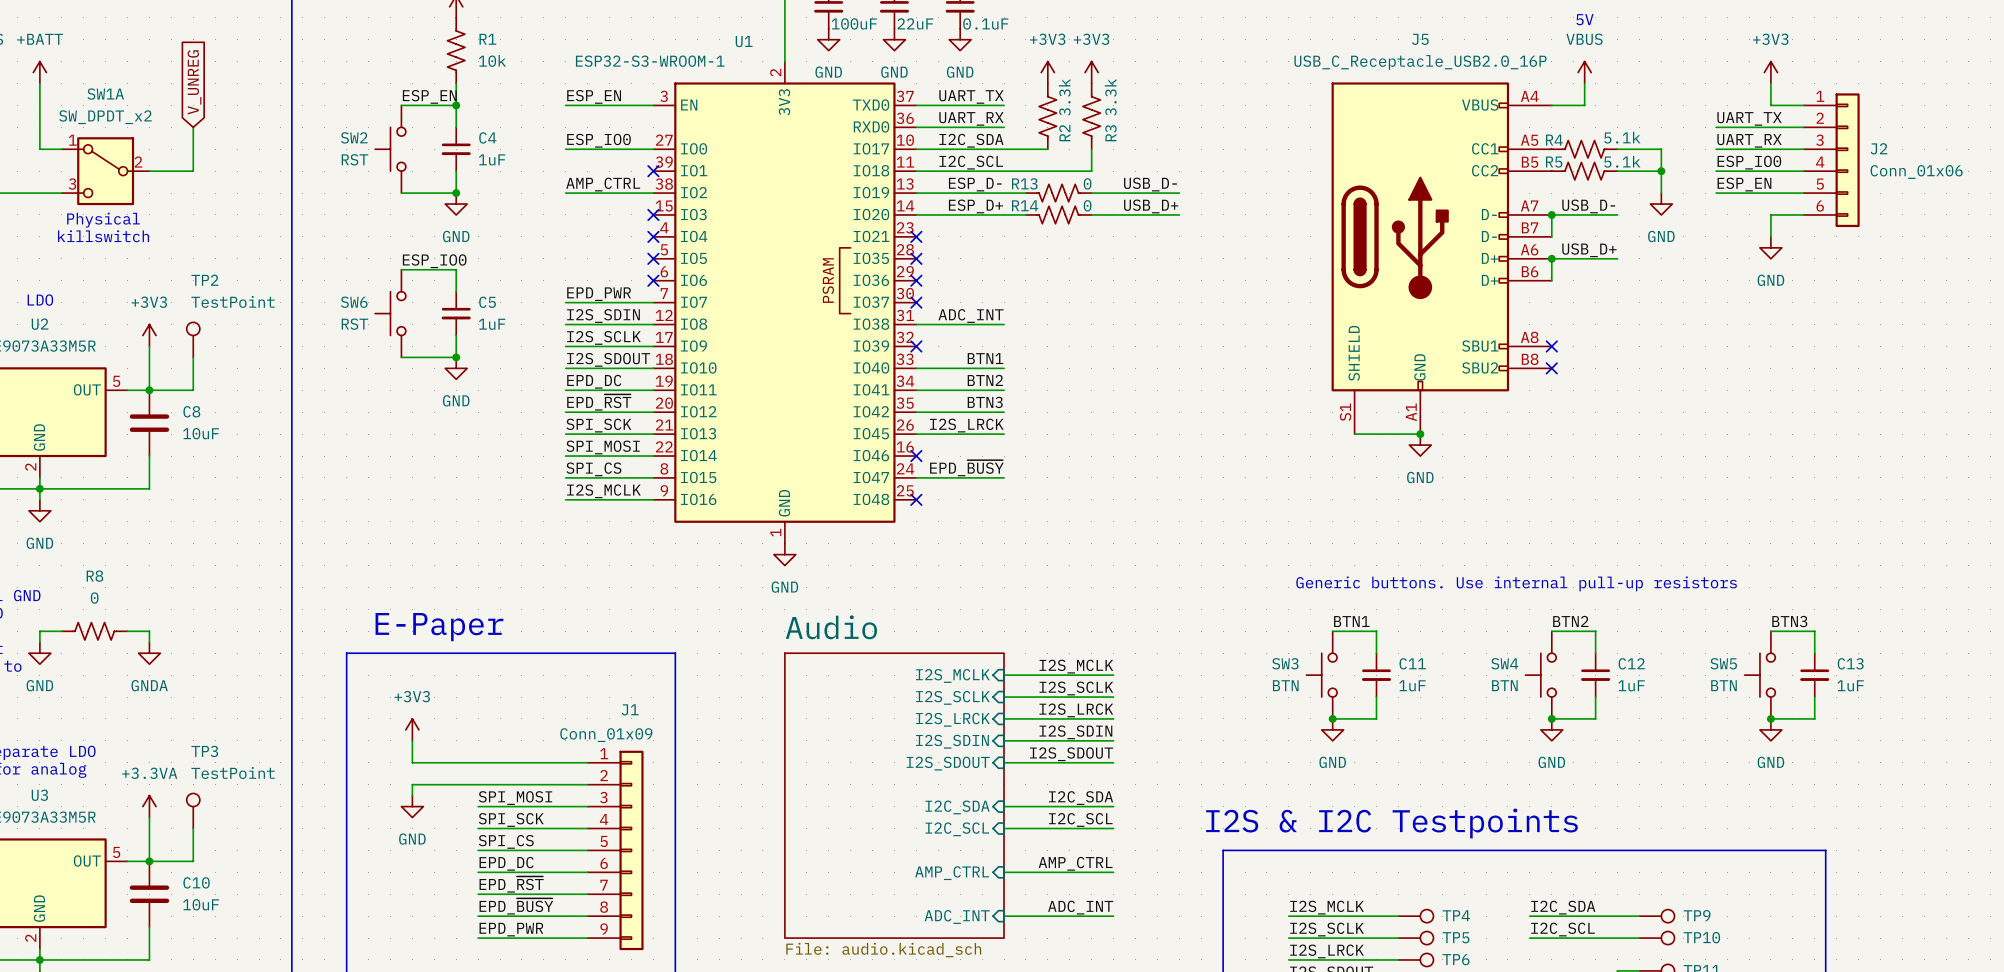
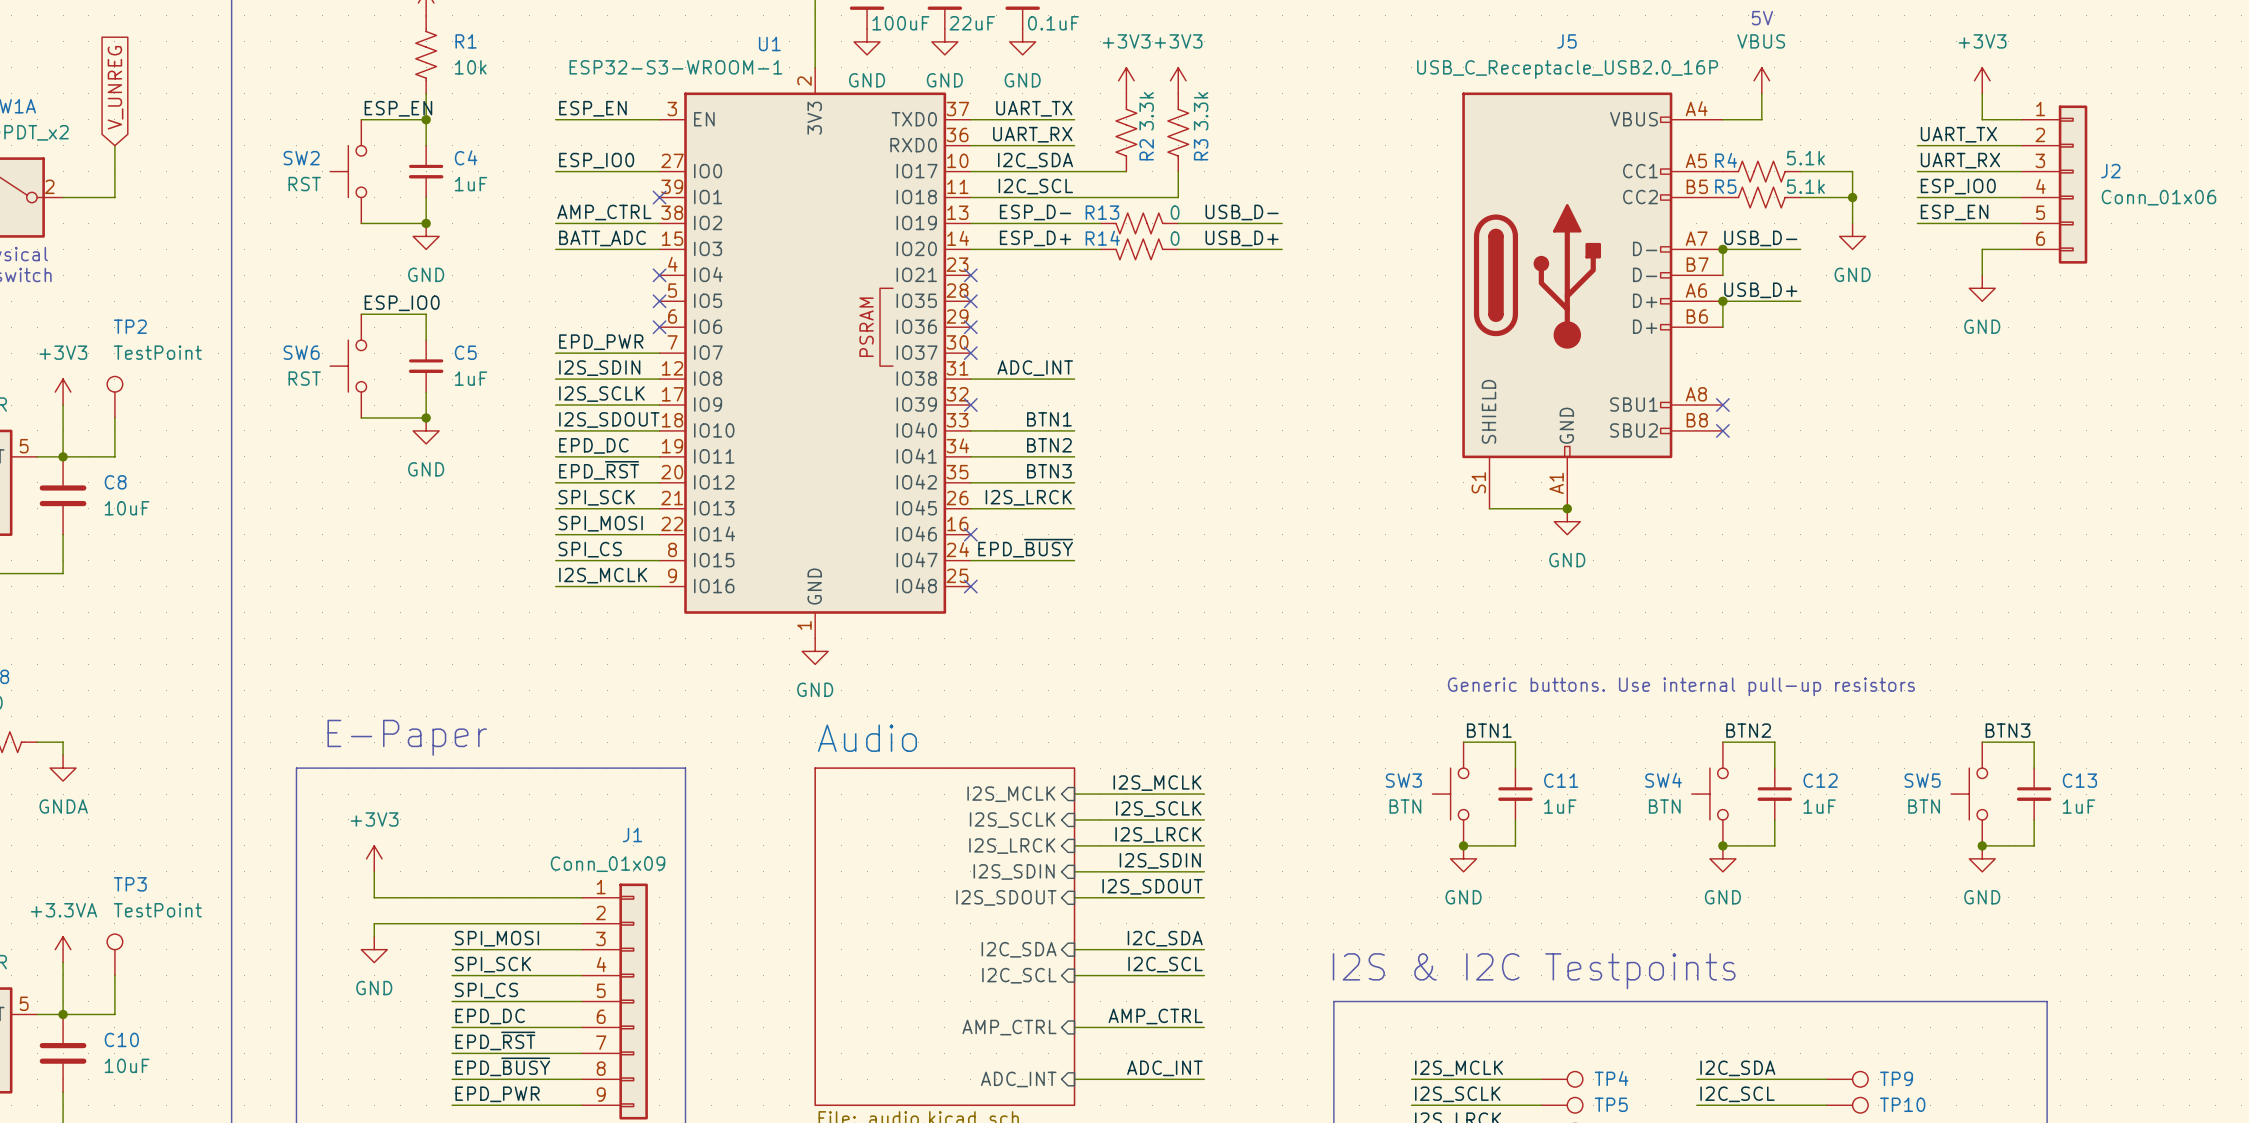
label: none -> BATT_ADC (602, 238)
wire: none -> (555, 249) (659, 249)
no-connect mark: (653, 214) -> none

